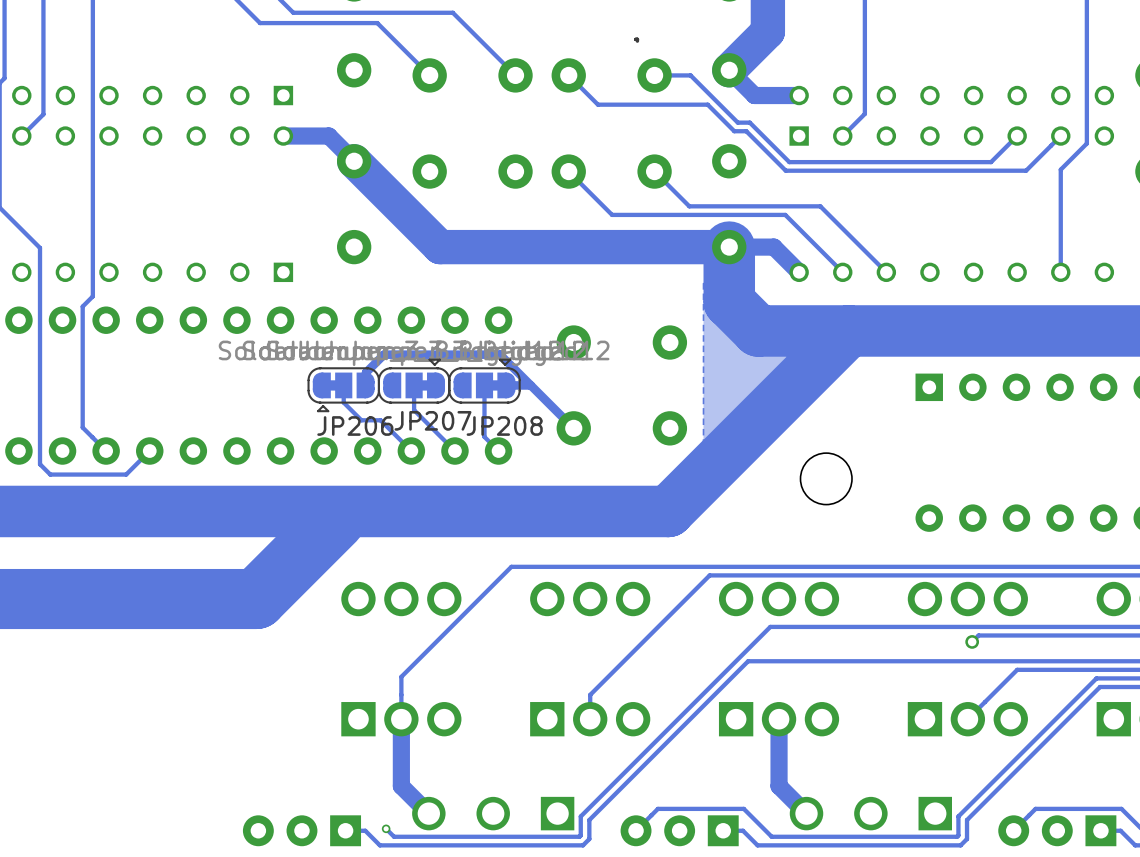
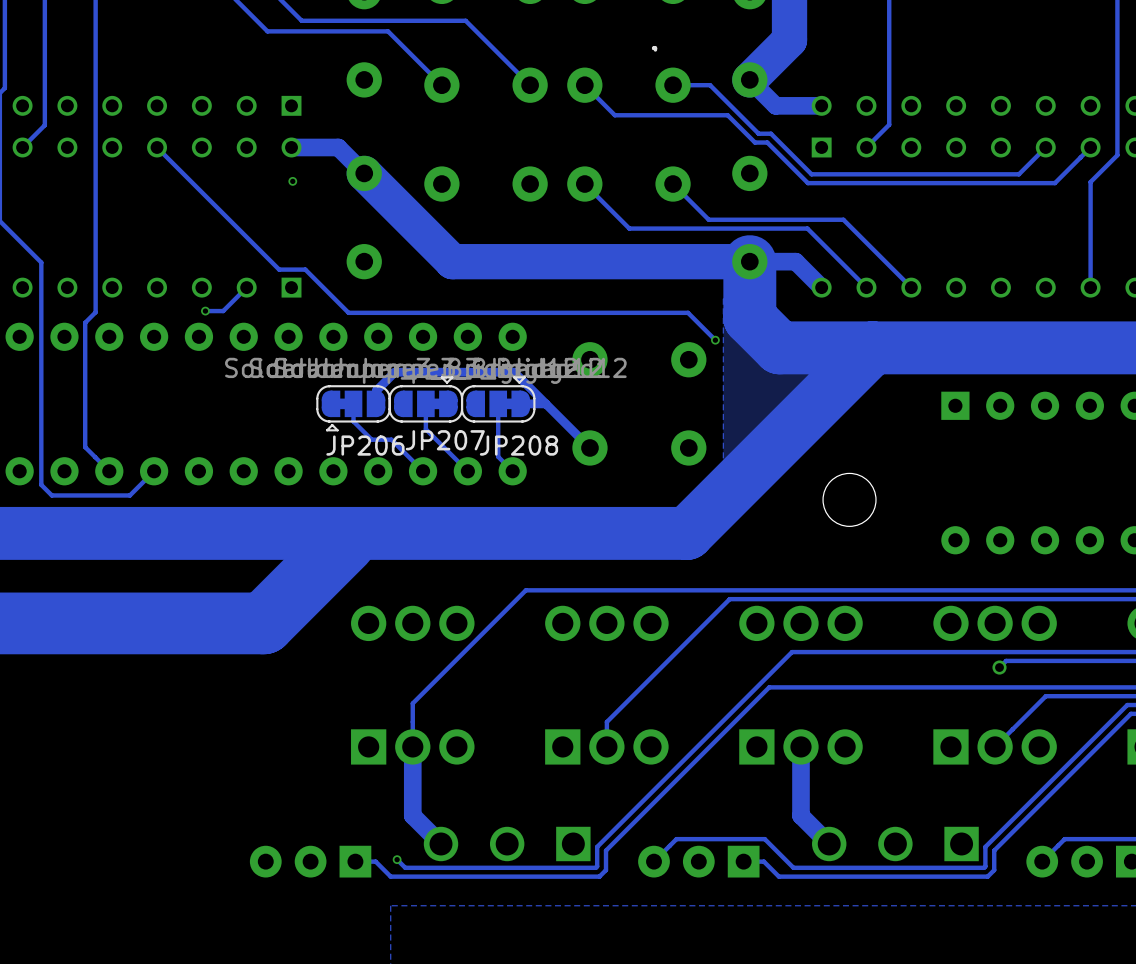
track: none -> (157, 147) (279, 269) (305, 269) (348, 312) (688, 312) (715, 340)
via: none -> (292, 181)
track: none -> (246, 287) (223, 311) (205, 311)
via: none -> (205, 311)
via: none -> (715, 340)

